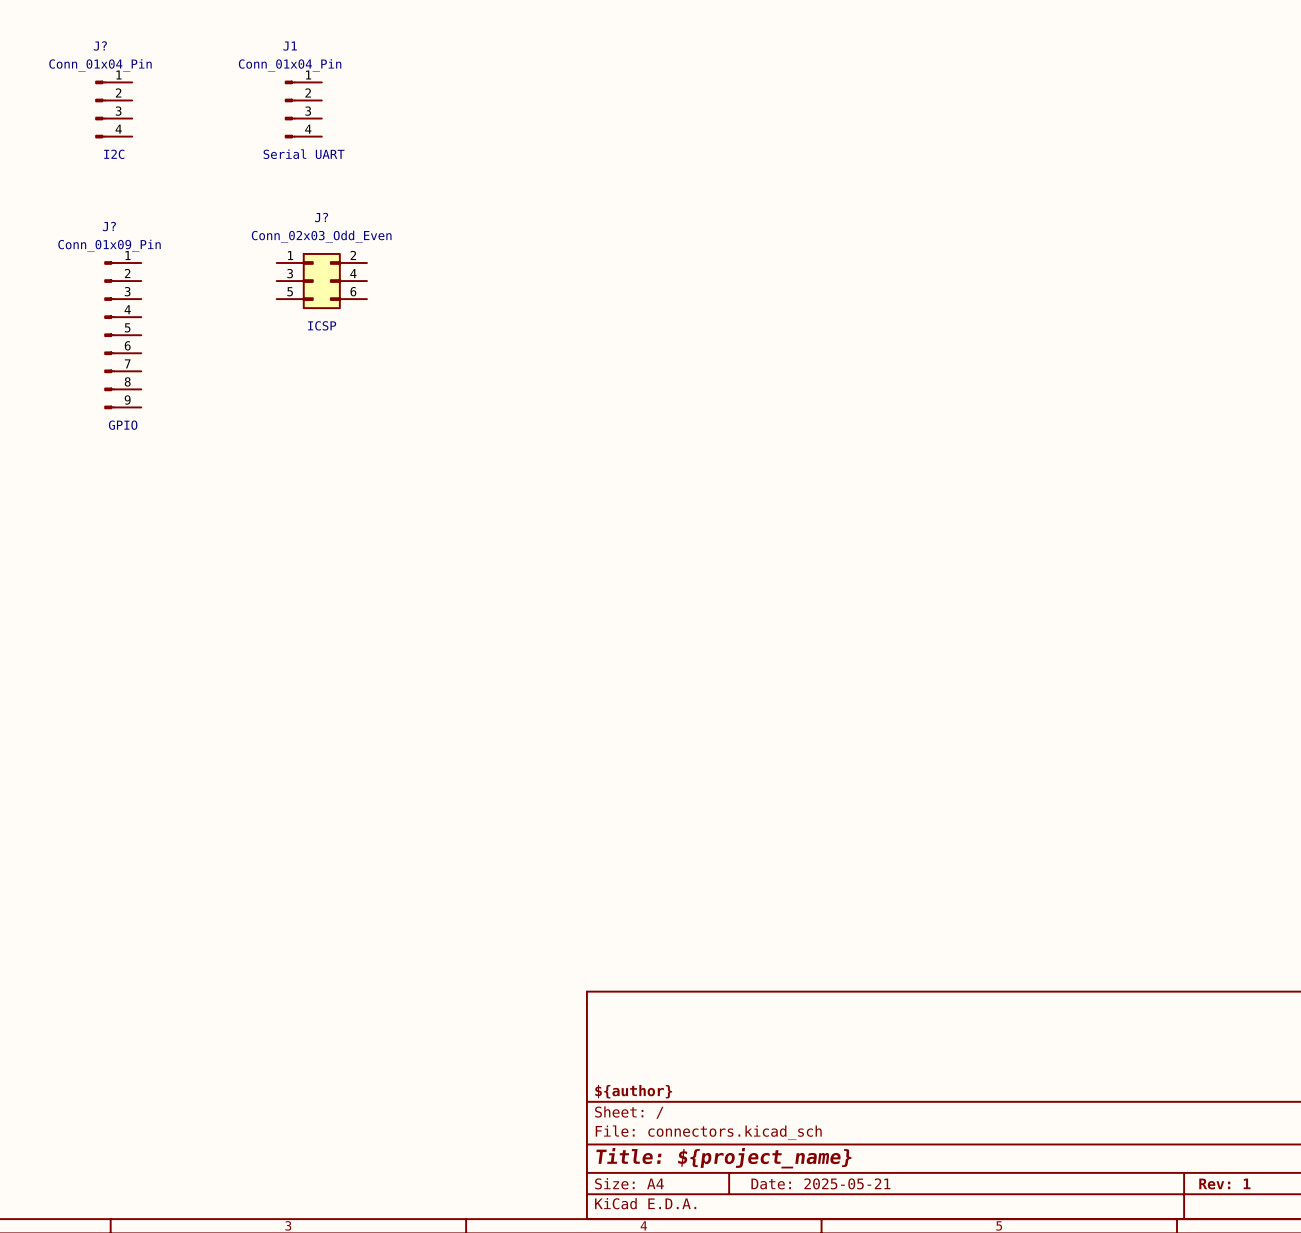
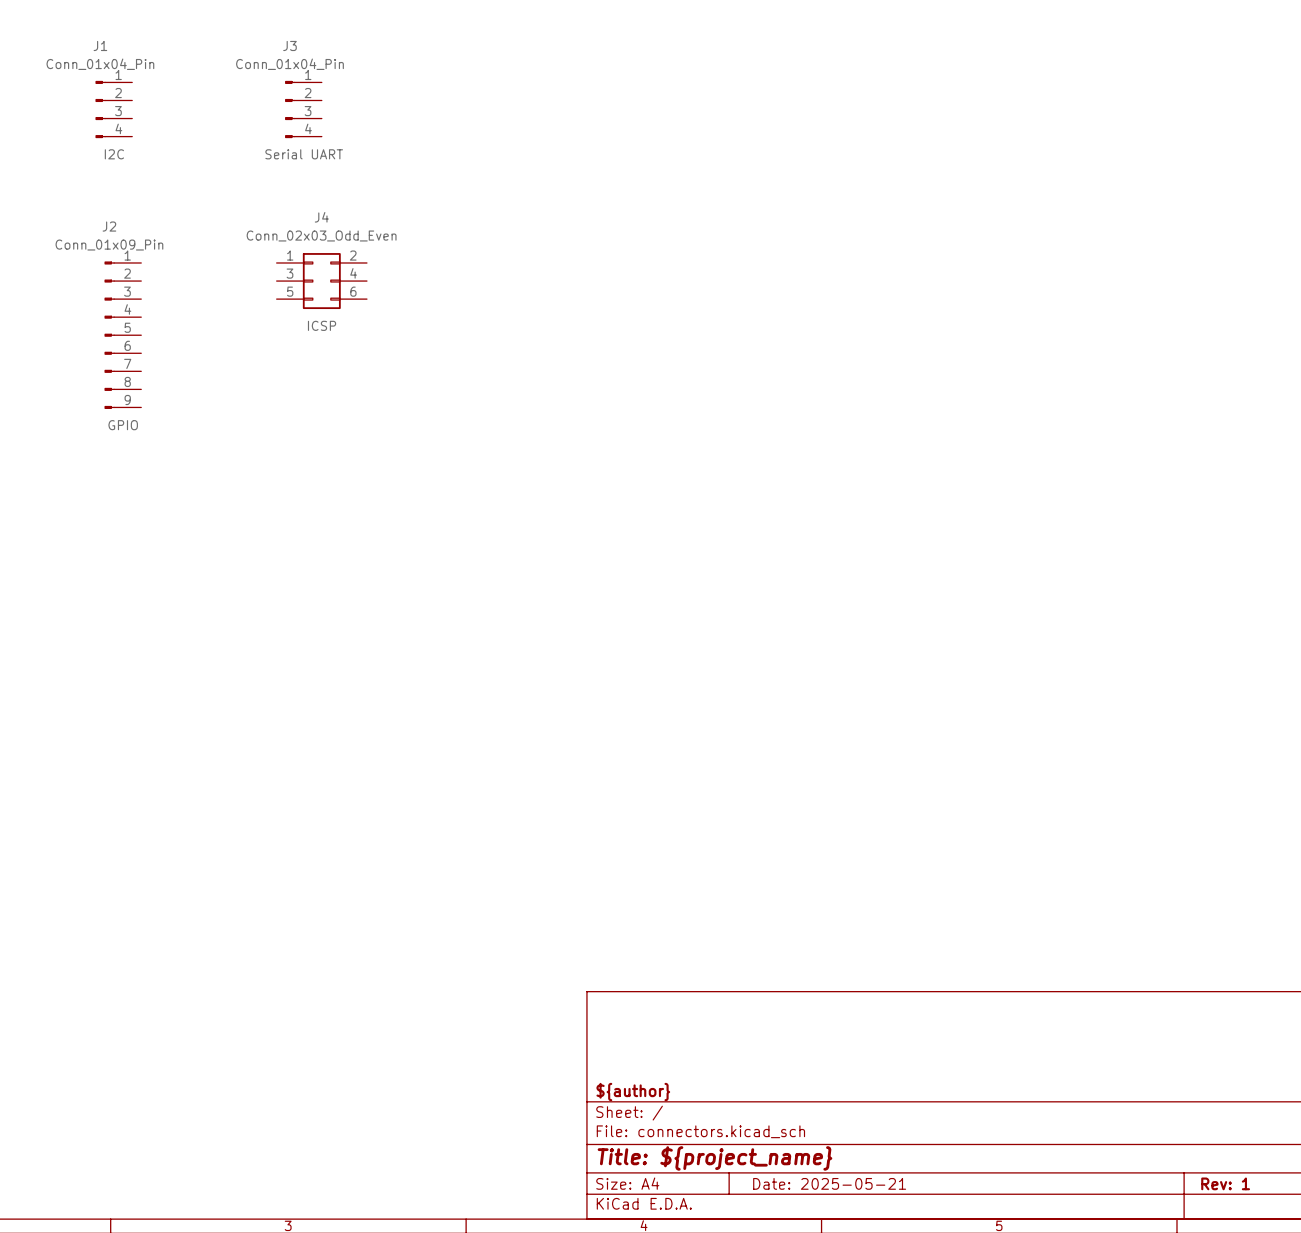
J? name: J? (100, 45) -> J1 (100, 45)
J1 name: J1 (290, 46) -> J3 (289, 45)
J? name: J? (321, 217) -> J4 (321, 217)
J? name: J? (109, 226) -> J2 (109, 226)

